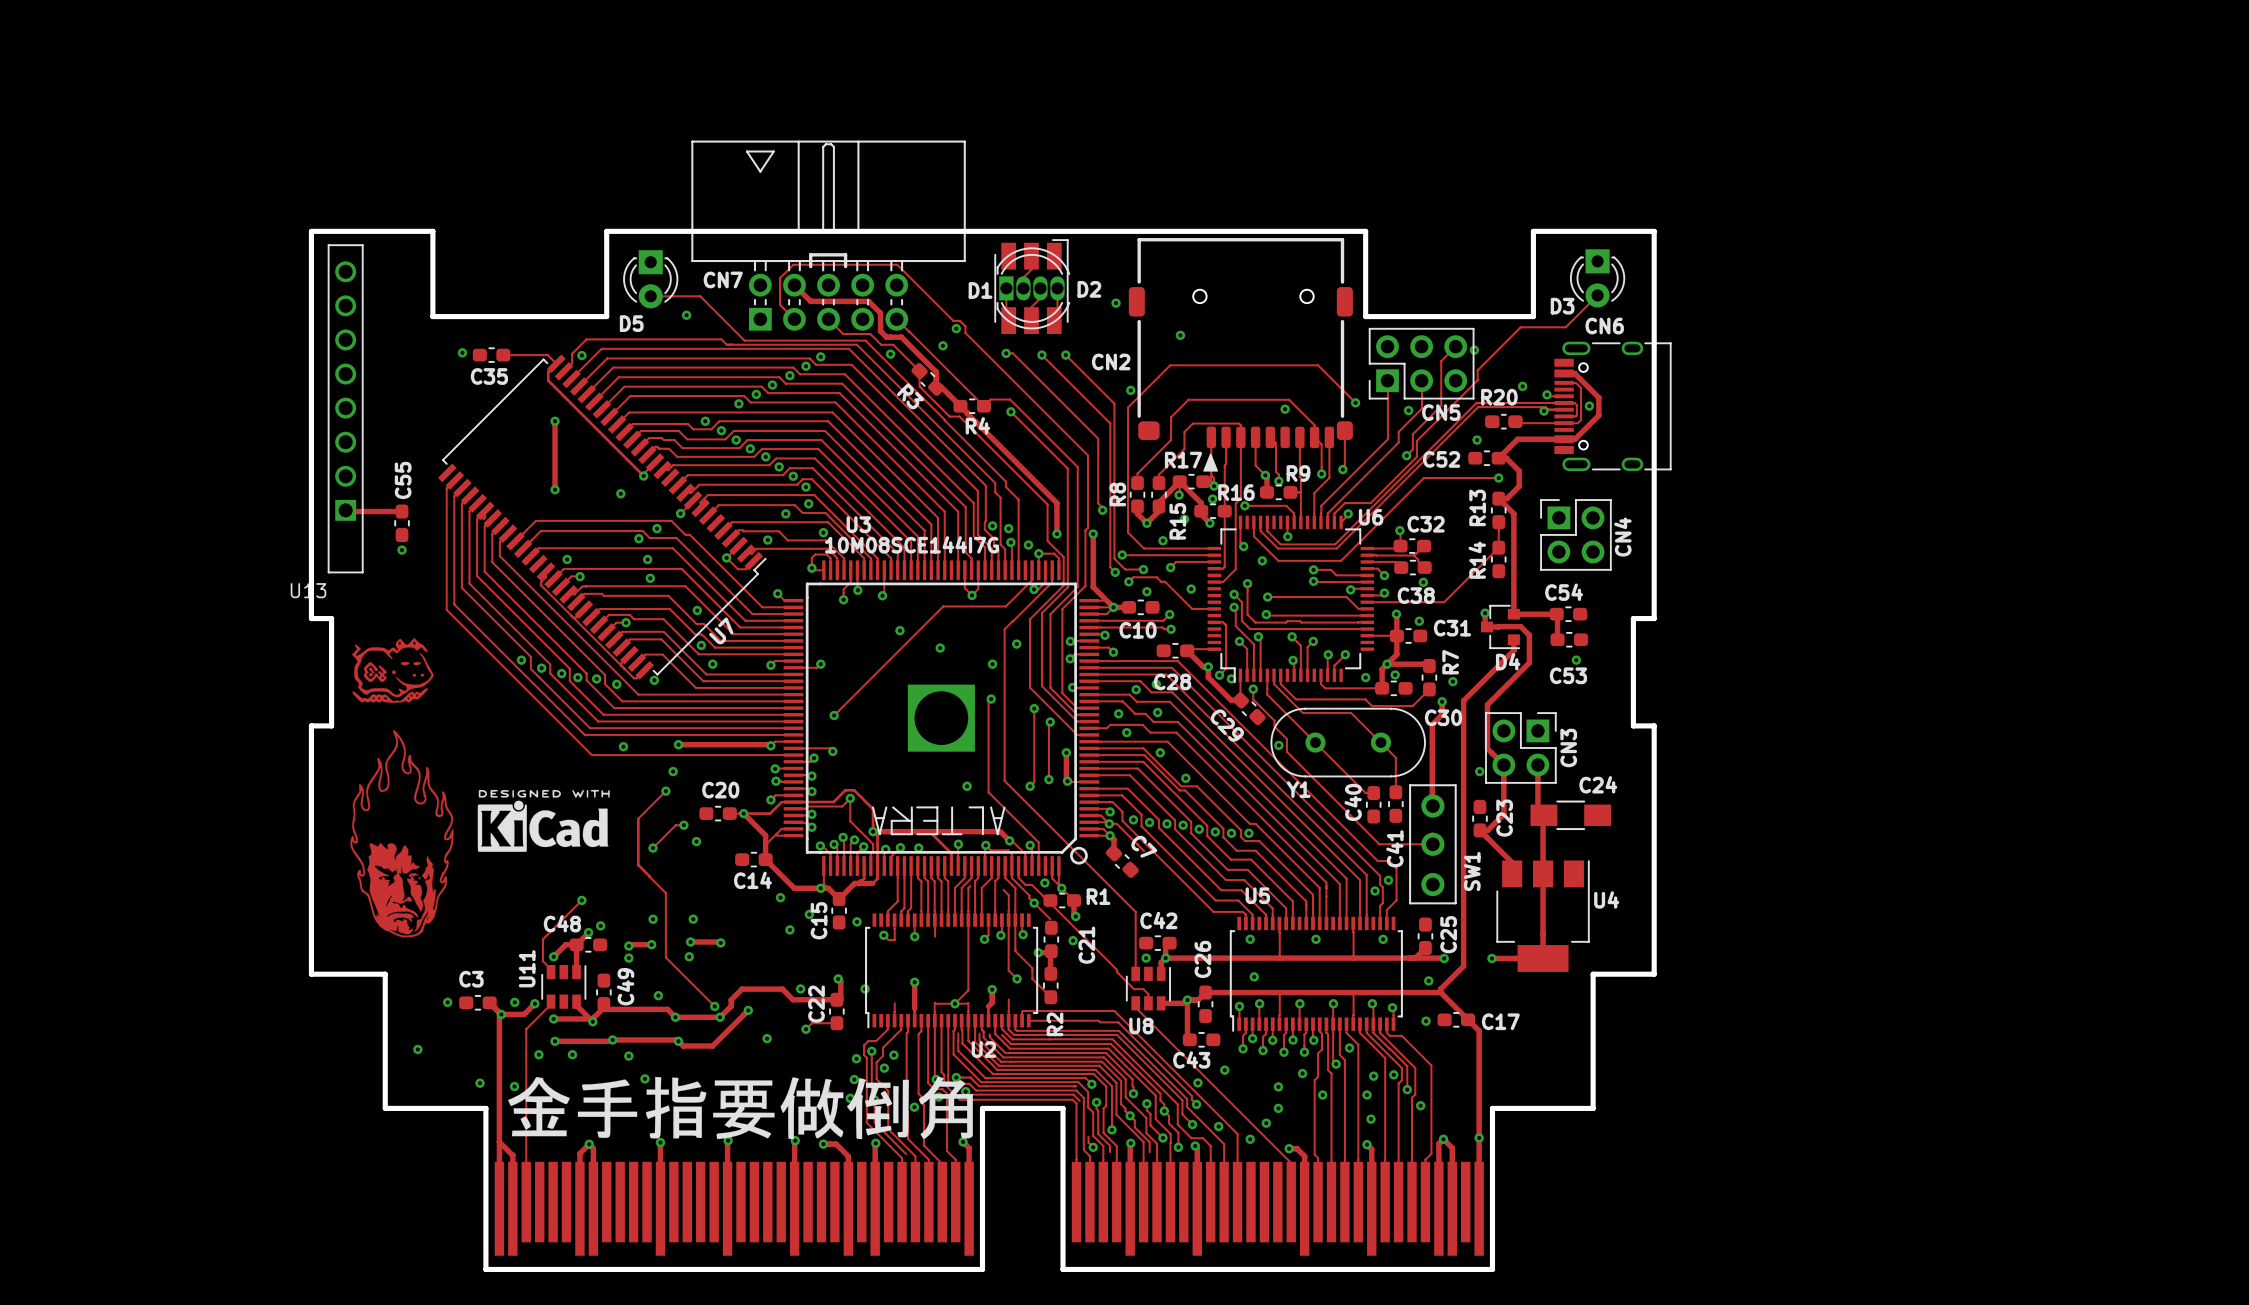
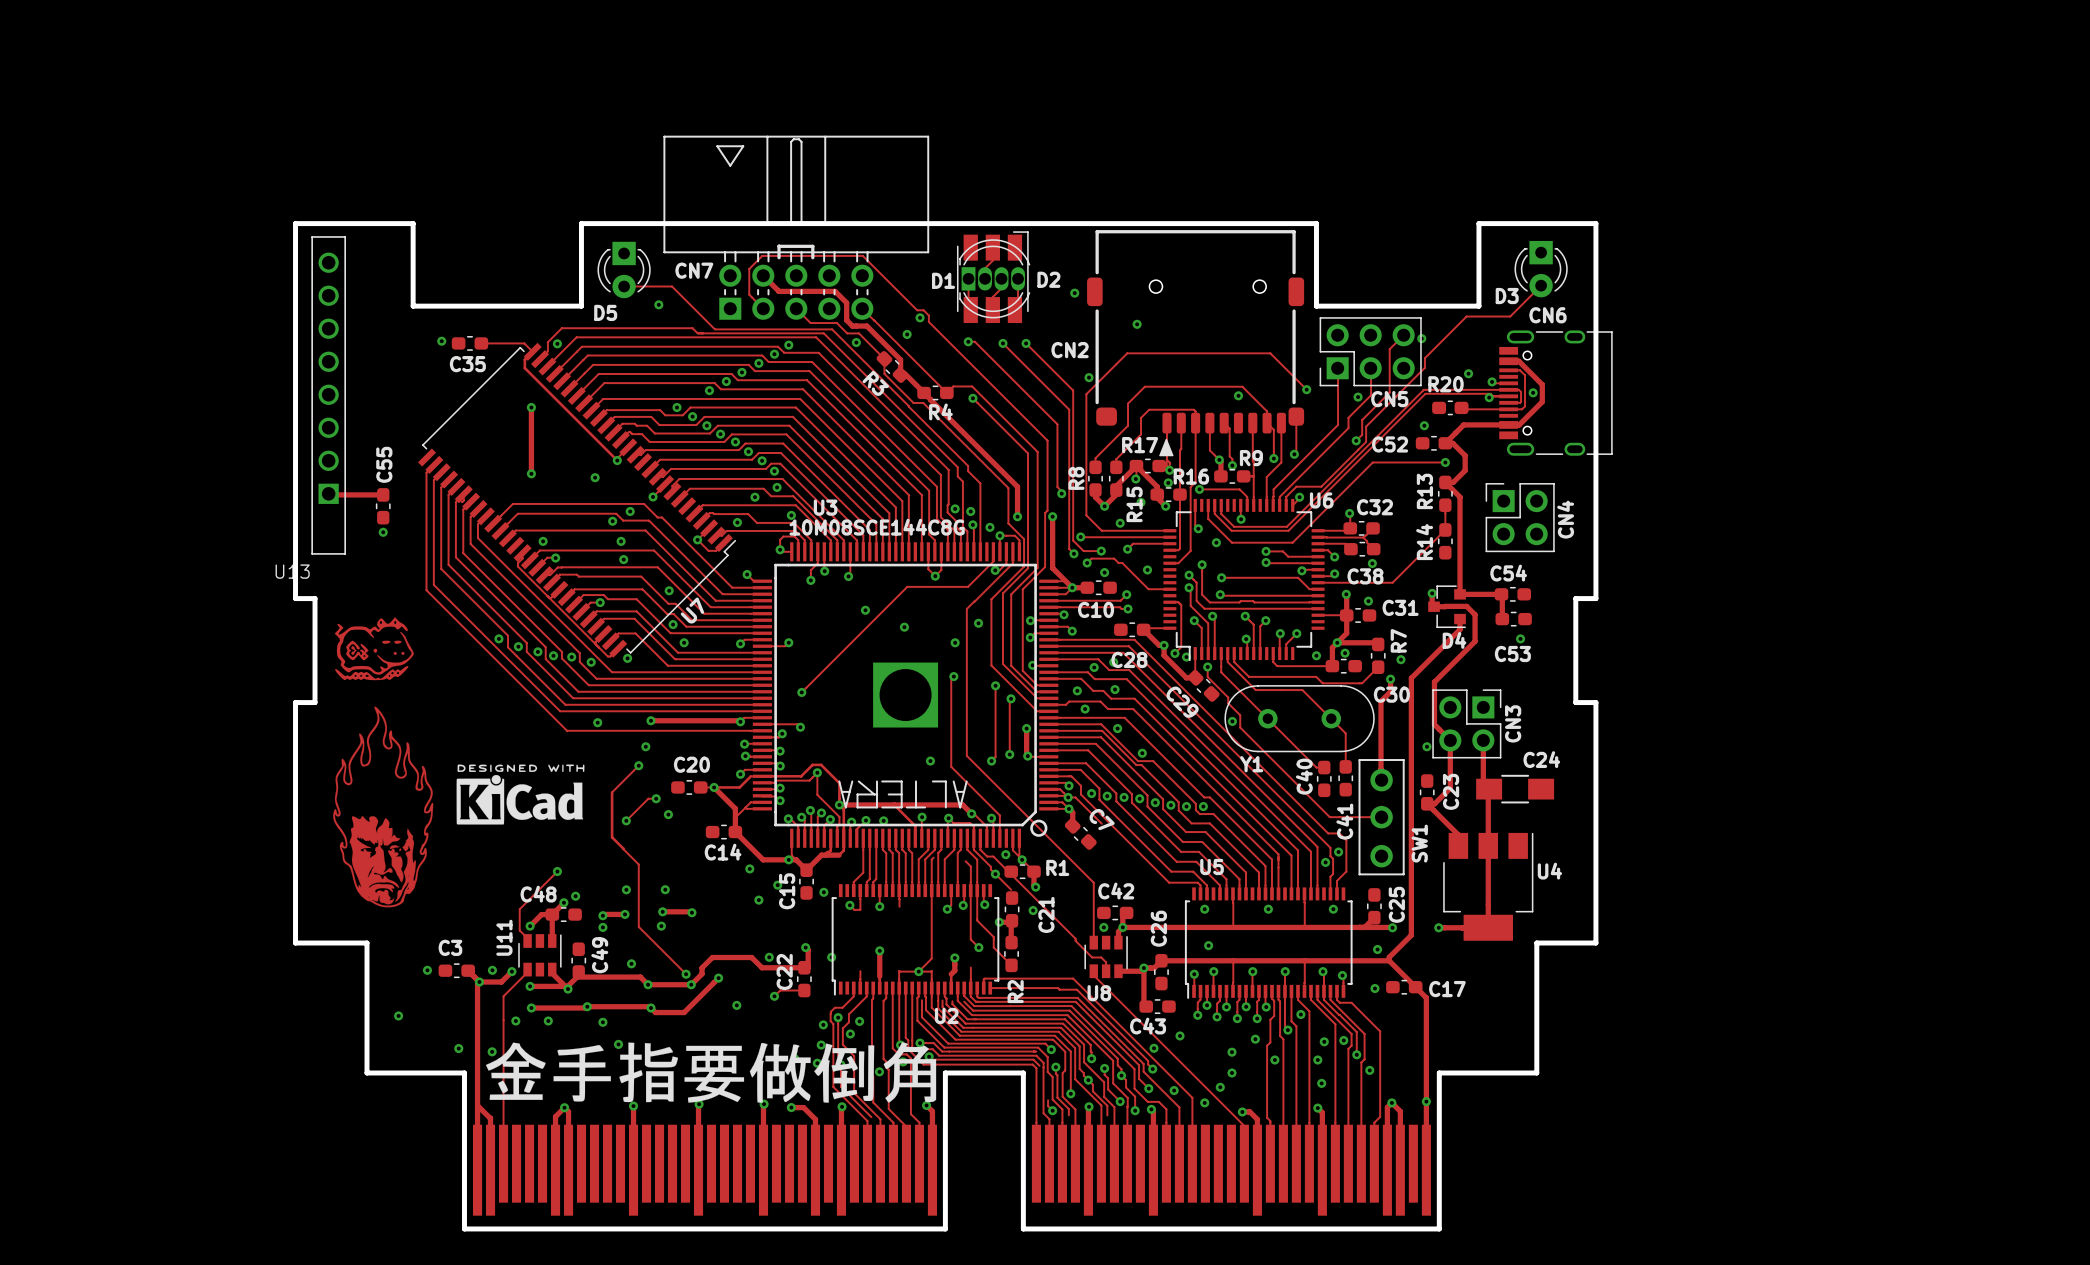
U3 value: 10M08SCE144I7G (912, 544) -> 10M08SCE144C8G (877, 527)

